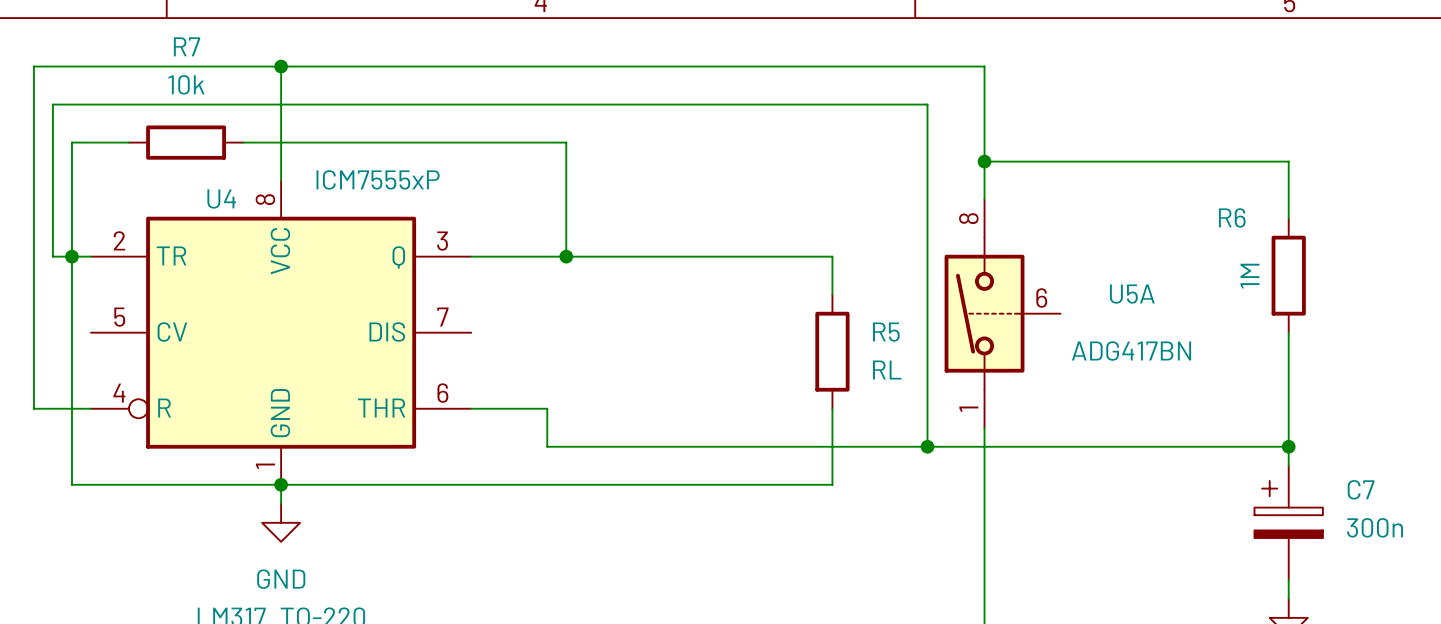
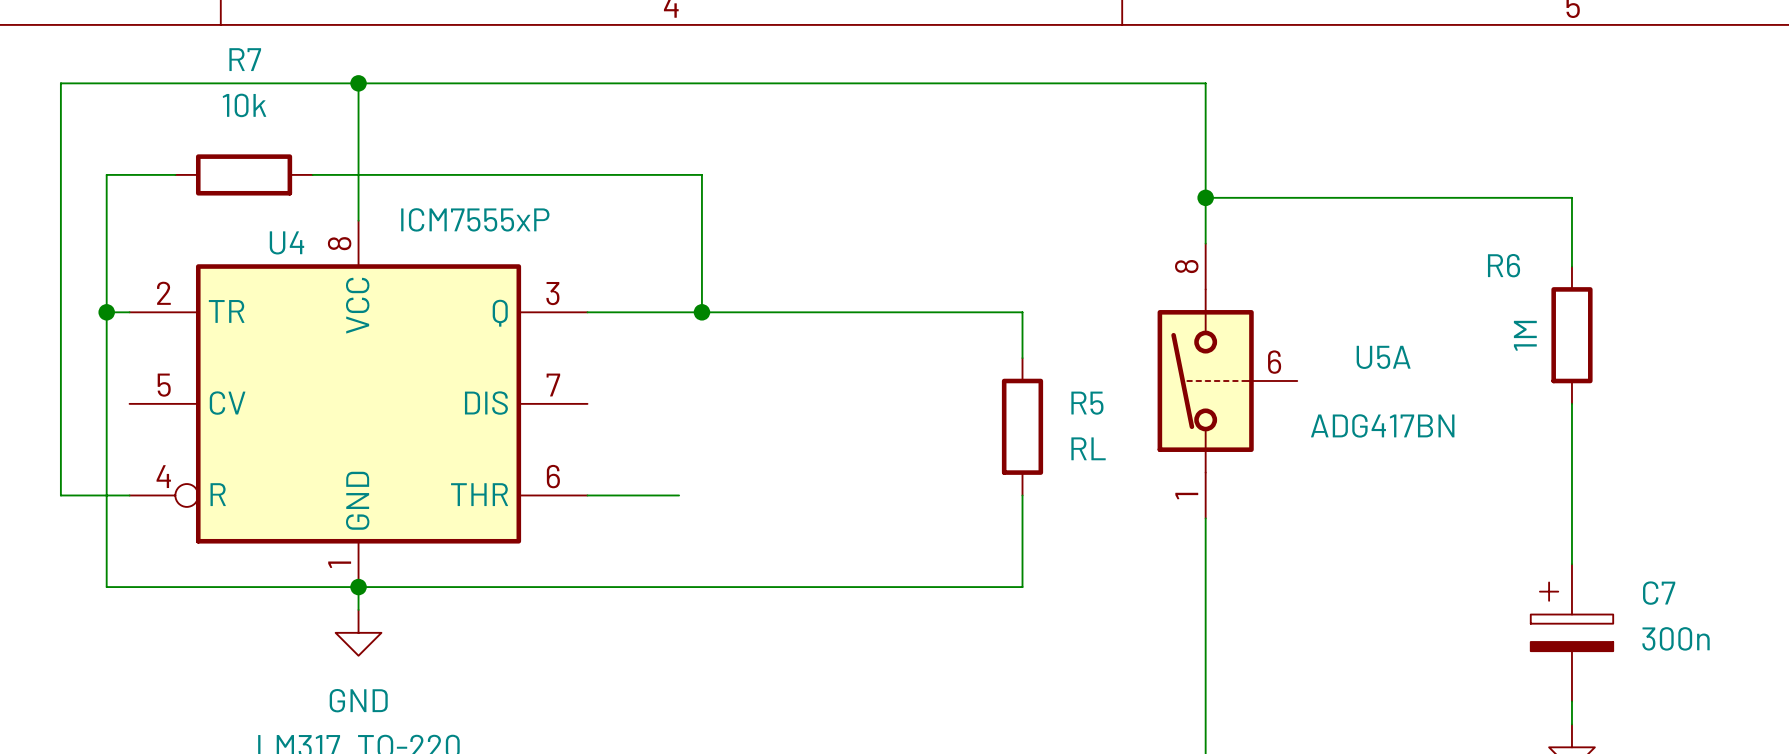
wire: (71, 256) (52, 256) (52, 104) (927, 104) (927, 446) -> none
wire: (547, 408) (547, 446) (1288, 446) -> none
junction: (927, 446) -> none
junction: (1288, 446) -> none

